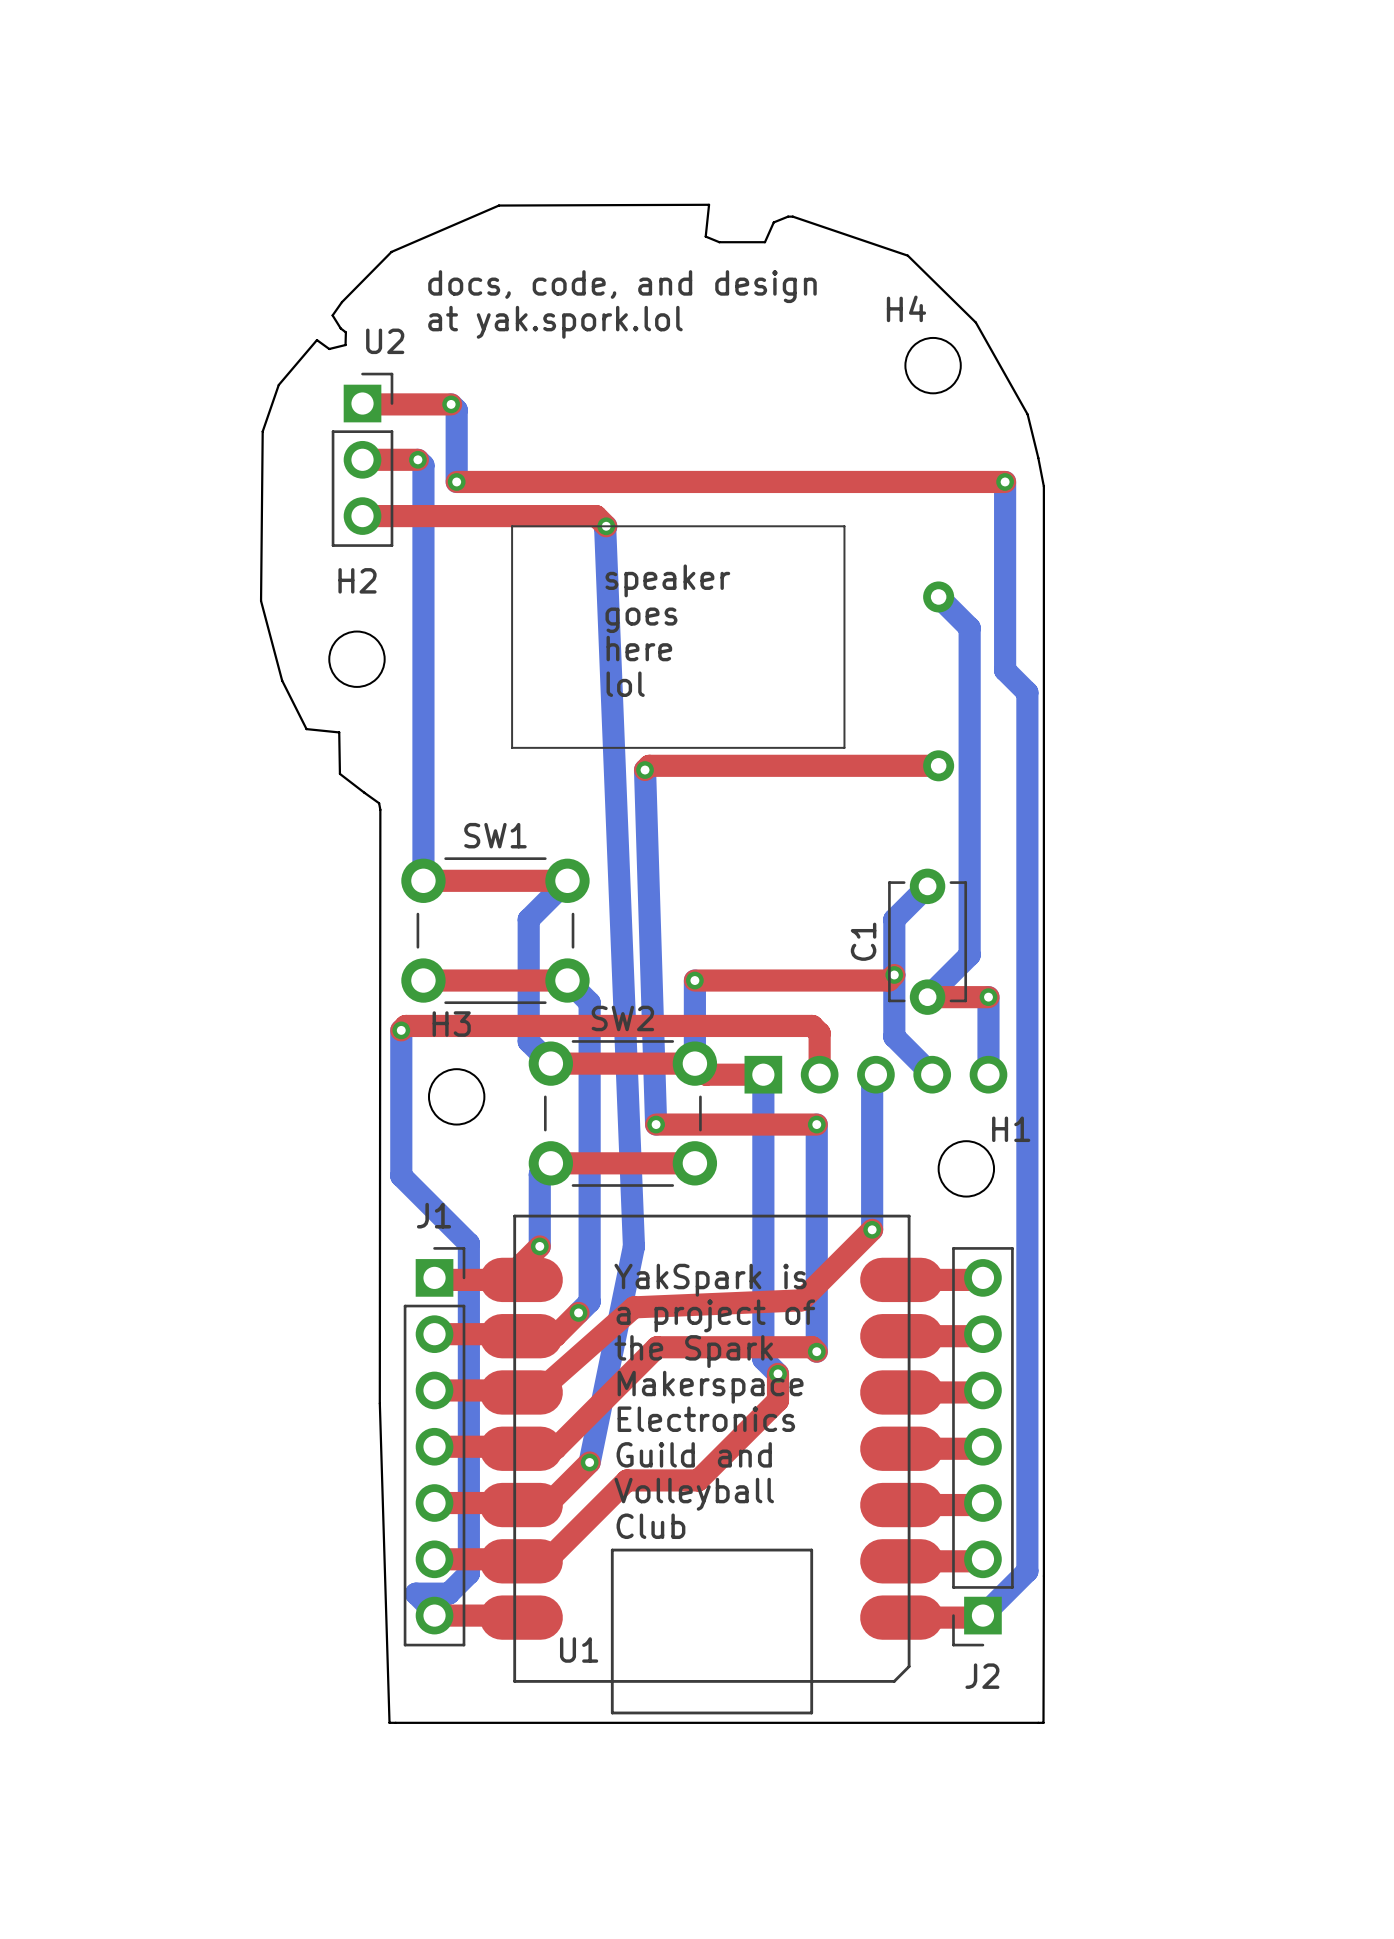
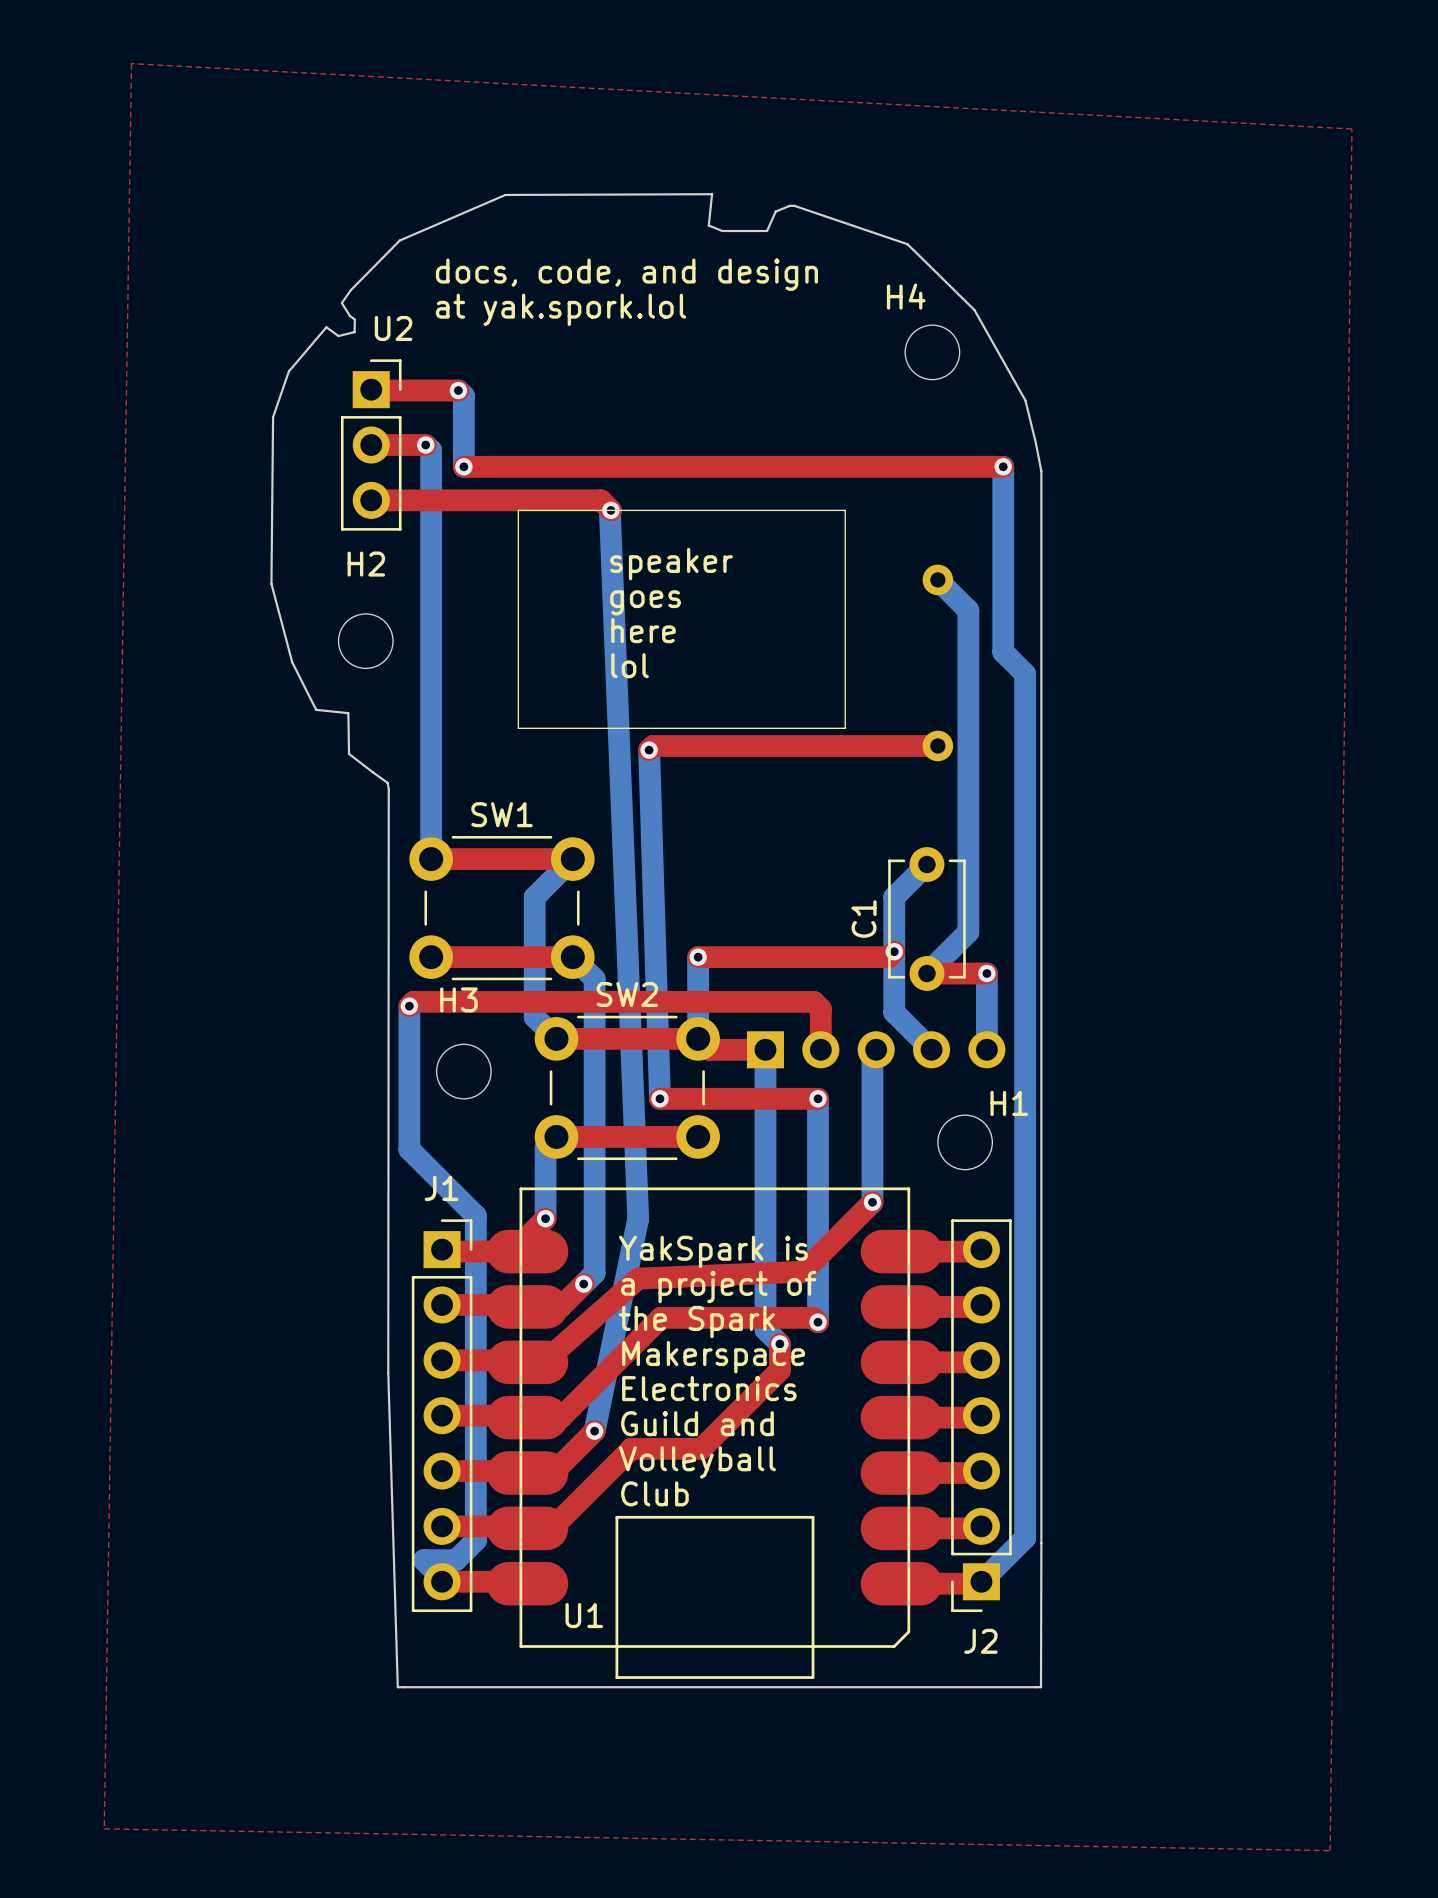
top zone outline: none -> (131, 63) (104, 1828) (1330, 1850) (1351, 129) (131, 63)

